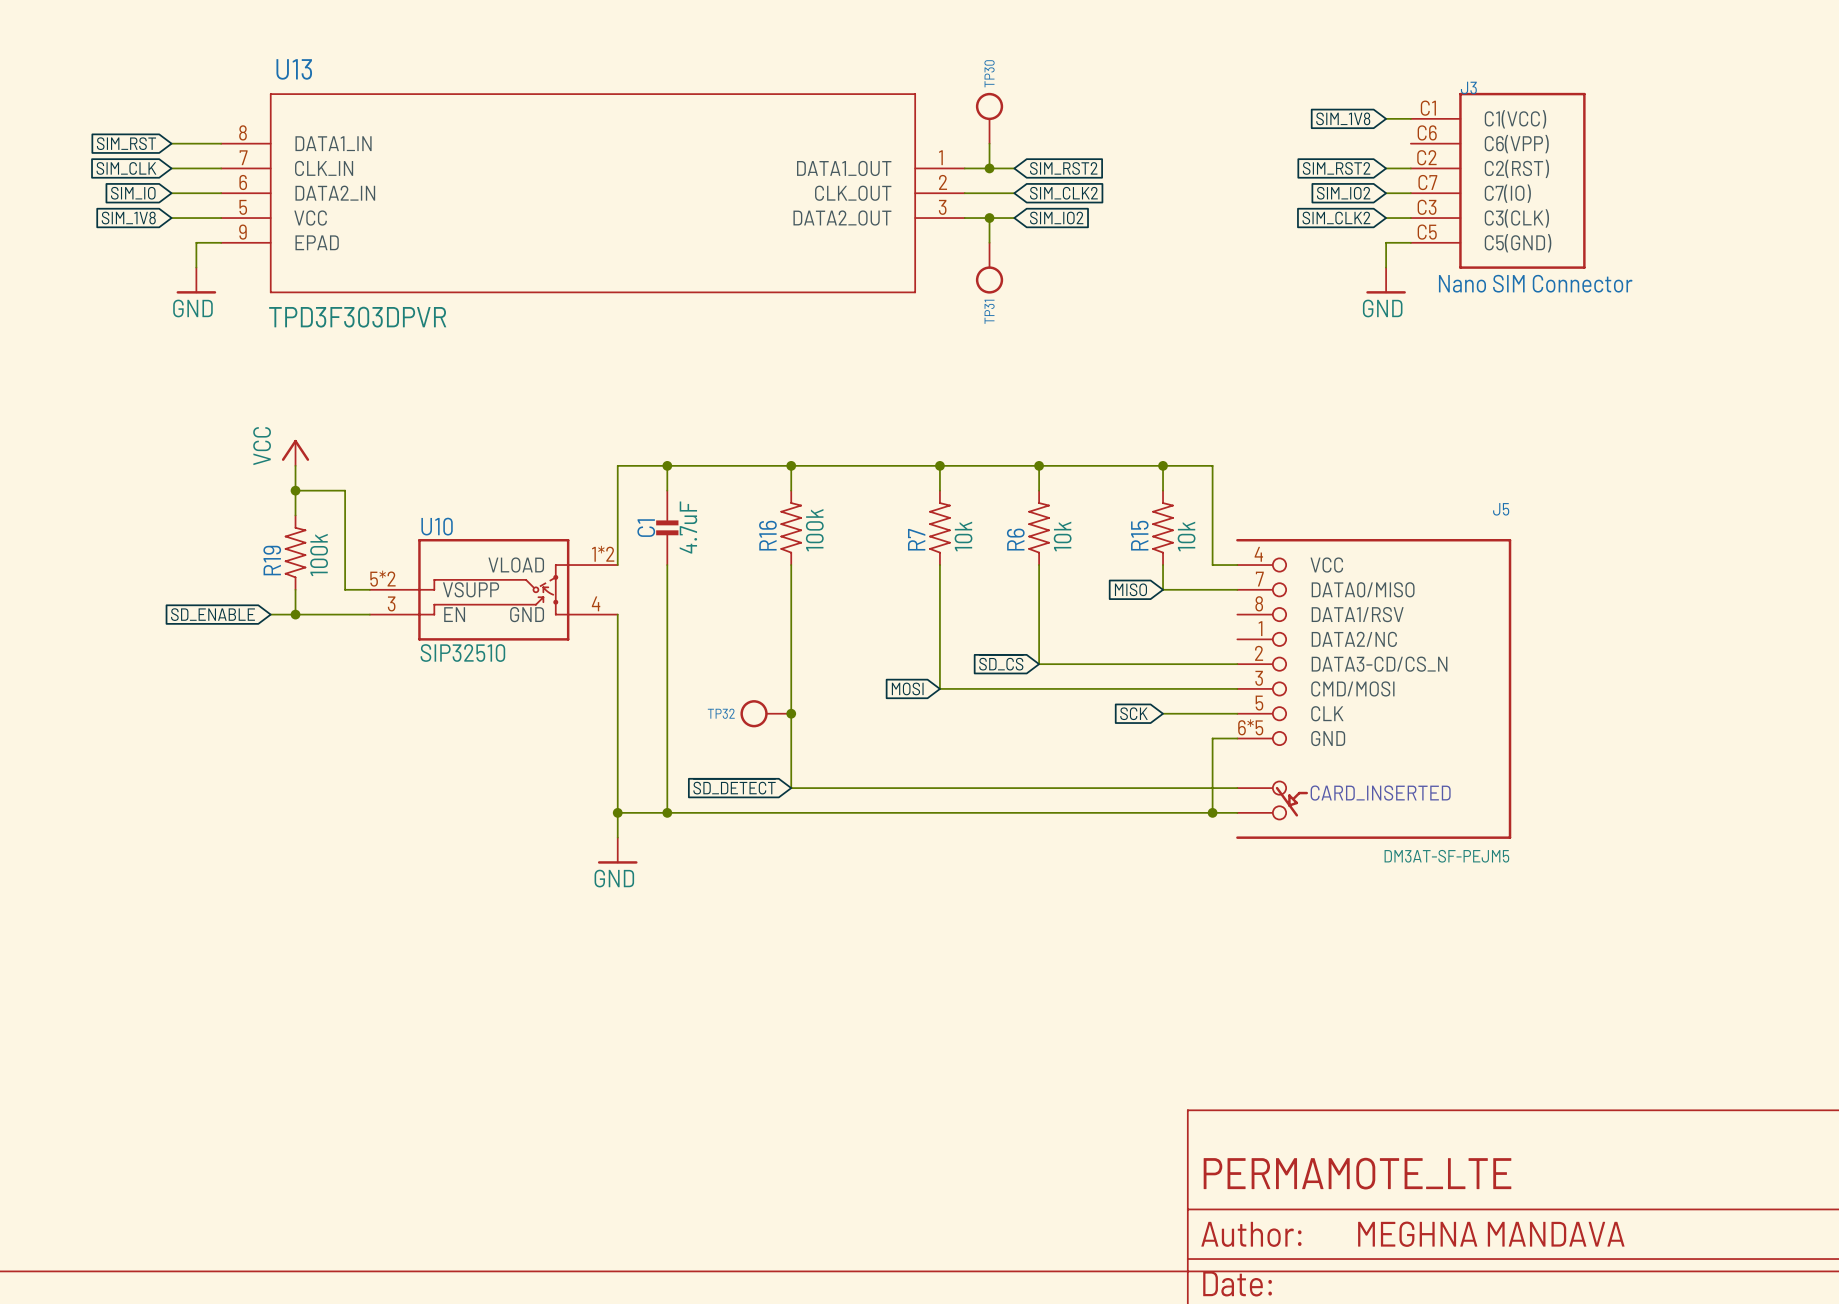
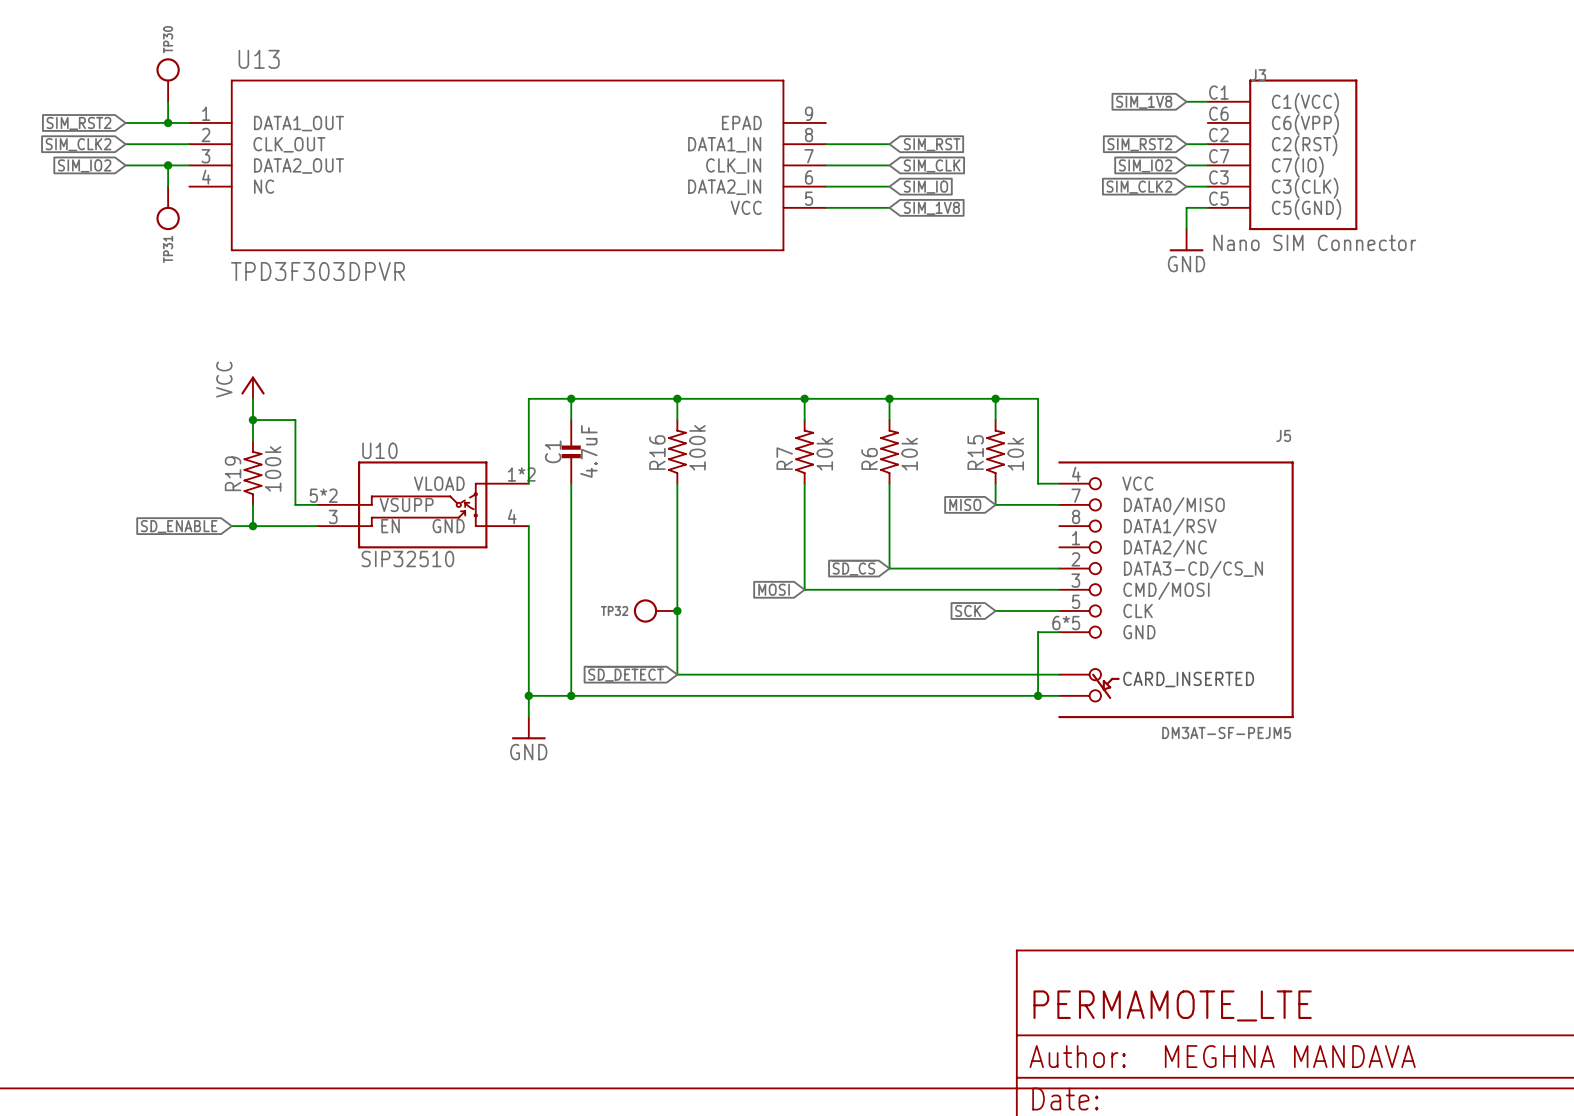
U13 symbol: [221, 93, 965, 294] -> [189, 79, 826, 251]
wire: none -> (168, 101) (168, 122)
TP30 position: (989, 118) -> (168, 80)
global label: SIM_RST (126, 143) -> SIM_RST2 (78, 123)
wire: none -> (125, 122) (146, 122)
junction: none -> (168, 122)
wire: (989, 143) (989, 168) -> none
global label: SIM_CLK (126, 168) -> SIM_CLK2 (78, 144)
wire: none -> (125, 144) (146, 144)
junction: (989, 168) -> none
wire: none -> (868, 144) (889, 144)
global label: SIM_RST2 (1063, 168) -> SIM_RST (932, 144)
global label: SIM_IO (133, 193) -> SIM_IO2 (84, 165)
wire: none -> (125, 165) (146, 165)
wire: none -> (168, 165) (168, 186)
junction: none -> (168, 165)
wire: none -> (868, 165) (889, 165)
global label: SIM_CLK2 (1063, 193) -> SIM_CLK (932, 165)
global label: SIM_1V8 (128, 218) -> none
wire: (171, 218) (221, 218) -> none
wire: (989, 218) (989, 242) -> none
junction: (989, 218) -> none
wire: none -> (868, 186) (889, 186)
global label: SIM_IO2 (1056, 218) -> SIM_IO (925, 187)
wire: (221, 242) (196, 242) (196, 267) -> none
wire: none -> (825, 207) (889, 207)
global label: none -> SIM_1V8 (931, 208)
TP31 position: (989, 268) -> (168, 208)
power symbol: GND (196, 280) -> none

